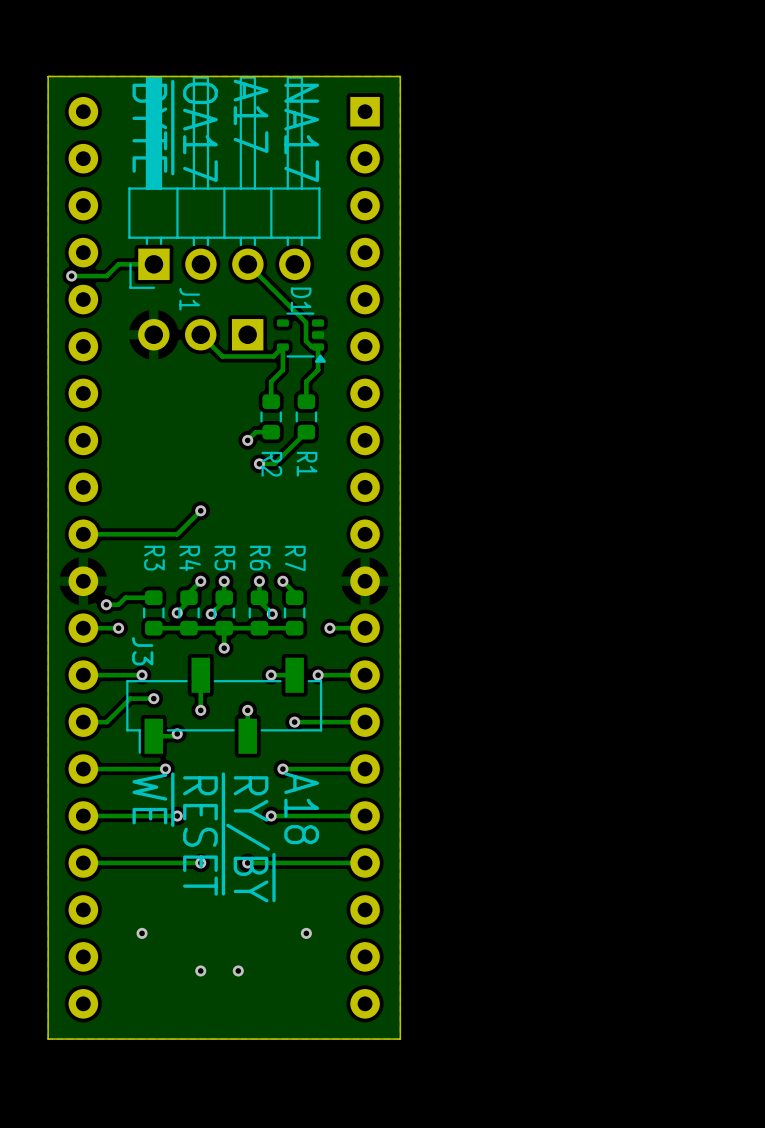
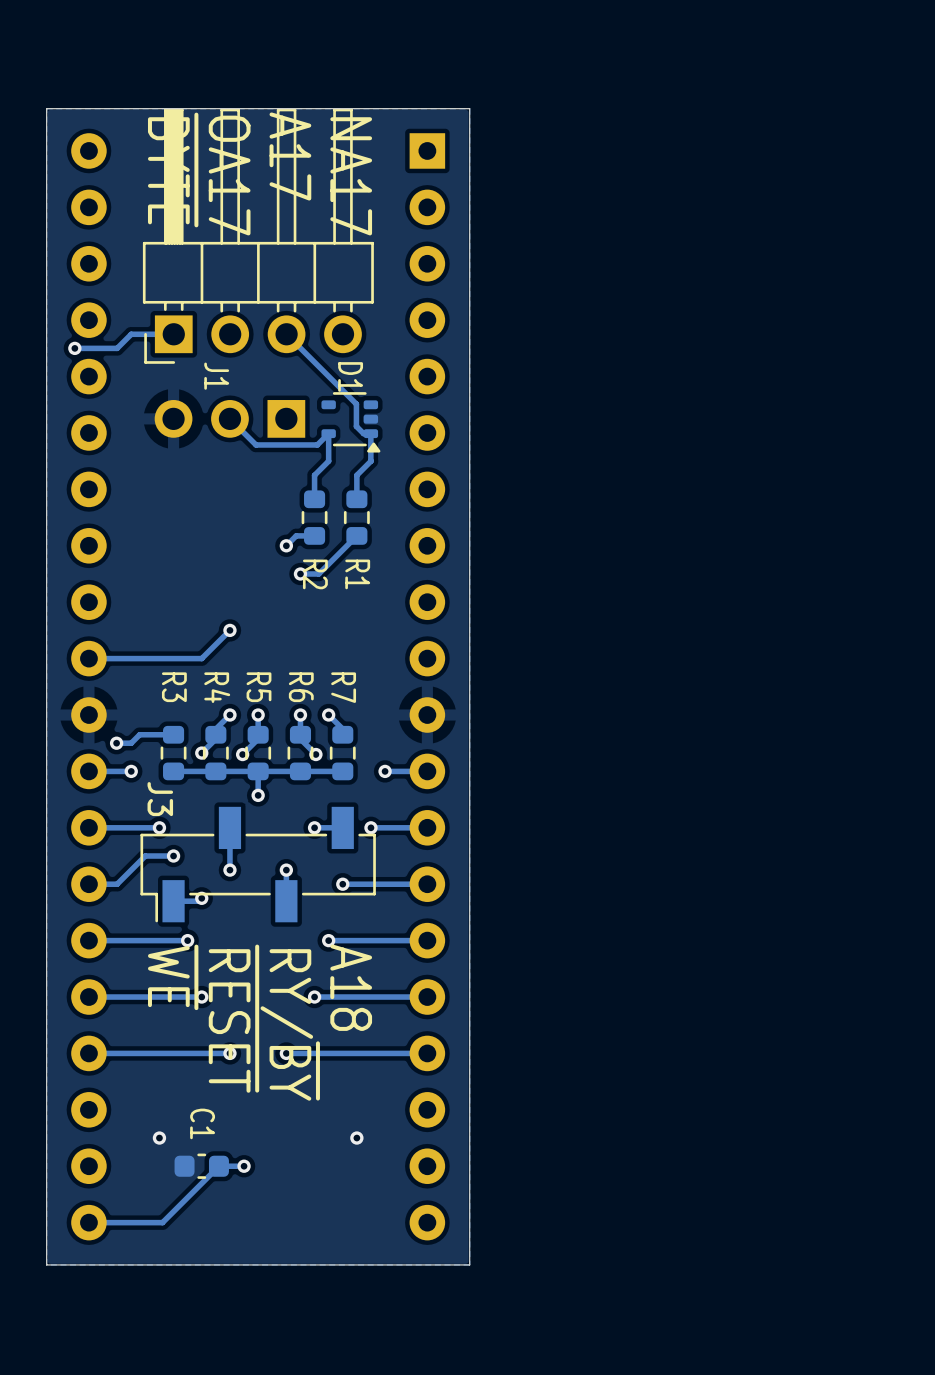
C1: none -> (201, 1166)
track: none -> (244, 1166) (218, 1166) (162, 1222) (88, 1222)
via: none -> (244, 1166)
via: (200, 970) -> none
via: (238, 970) -> none

